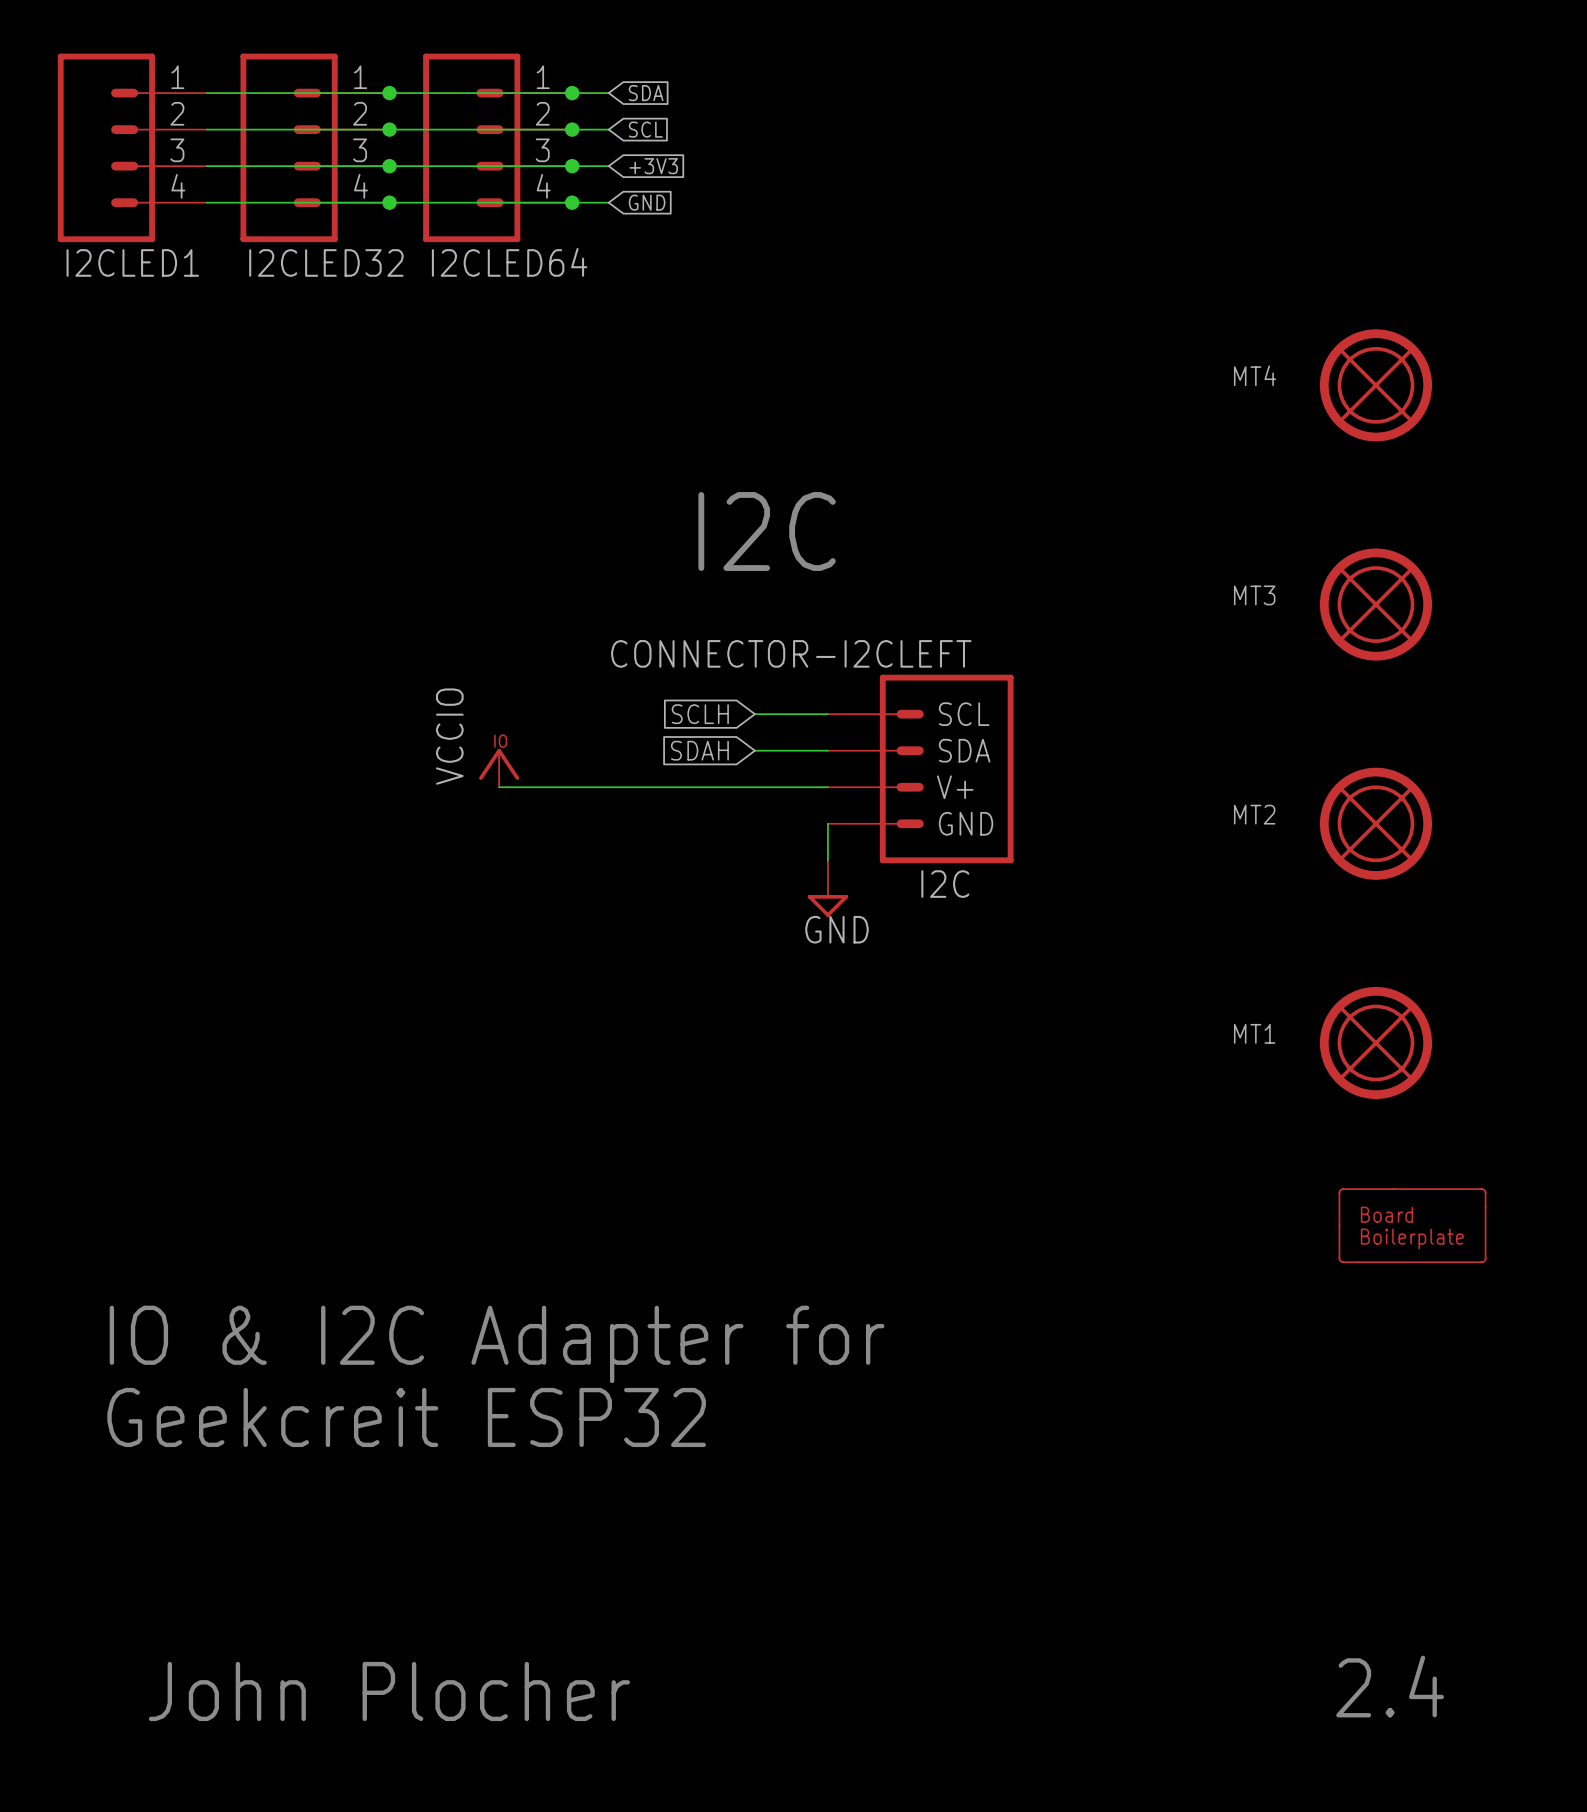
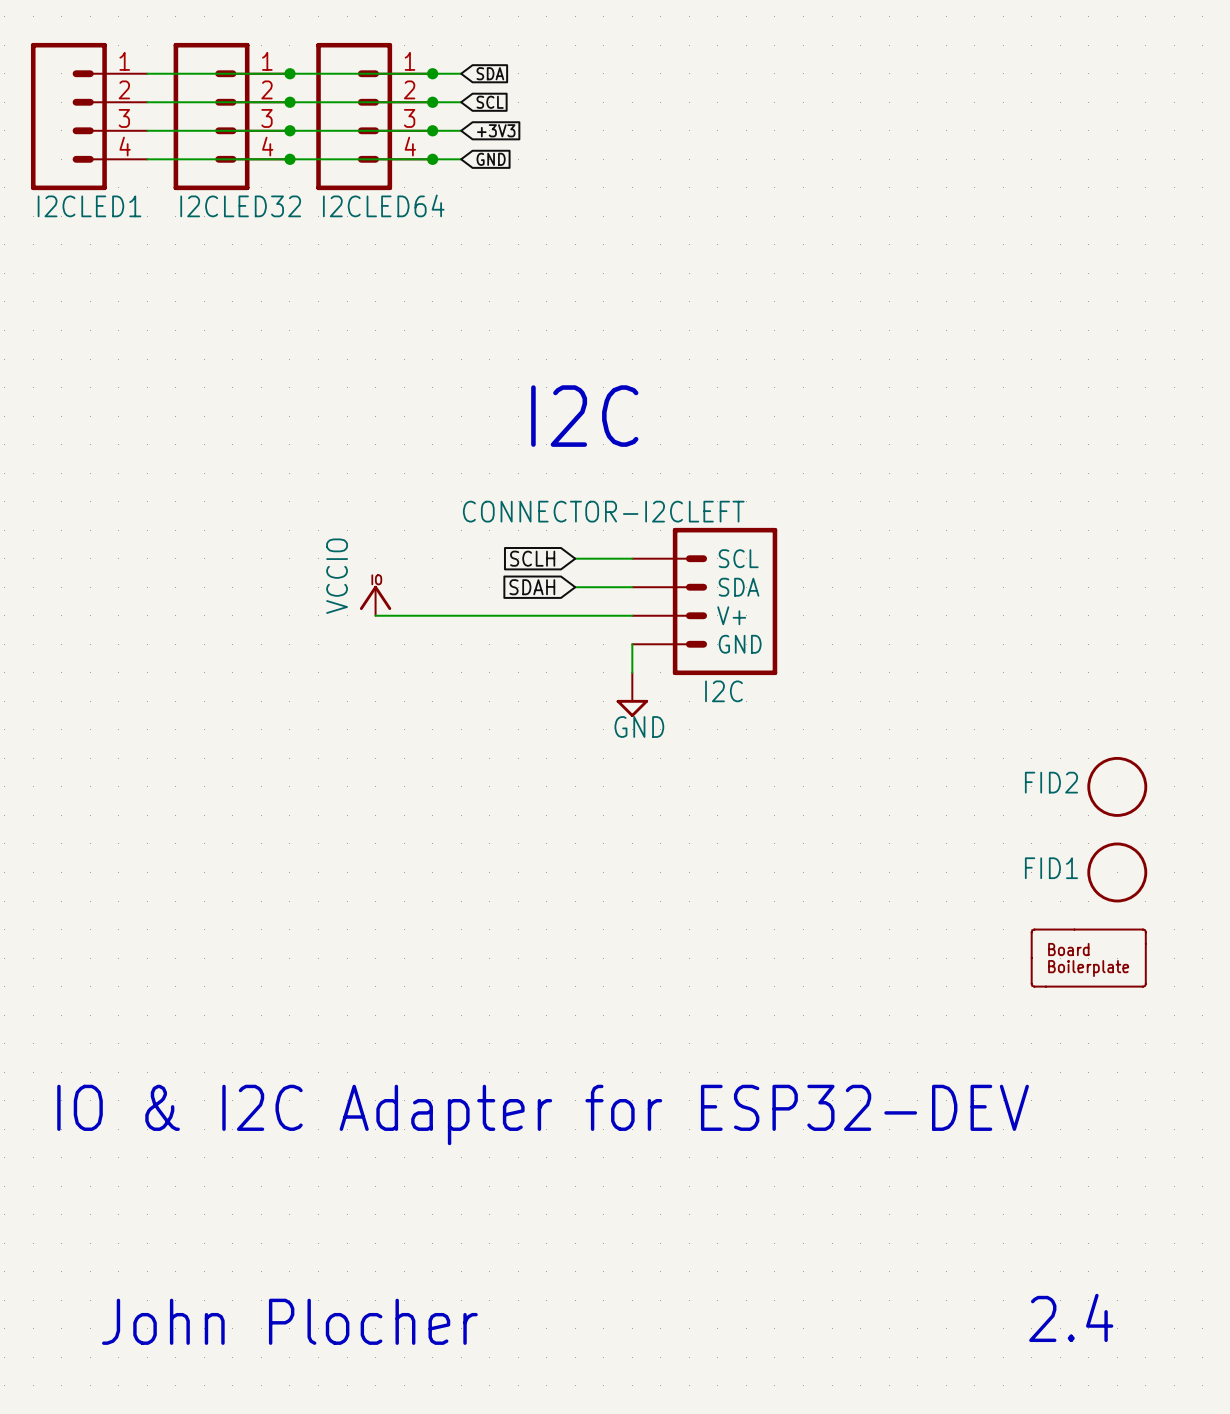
MT4: (1375, 385) -> none
MT3: (1375, 604) -> none
MT2: (1375, 823) -> none
FID2: none -> (1117, 786)
MT1: (1375, 1042) -> none
FID1: none -> (1117, 872)
text: IO & I2C Adapter for (497, 1344) -> IO & I2C Adapter for ESP32-DEV (543, 1114)
text: Geekcreit ESP32 (406, 1417) -> none

